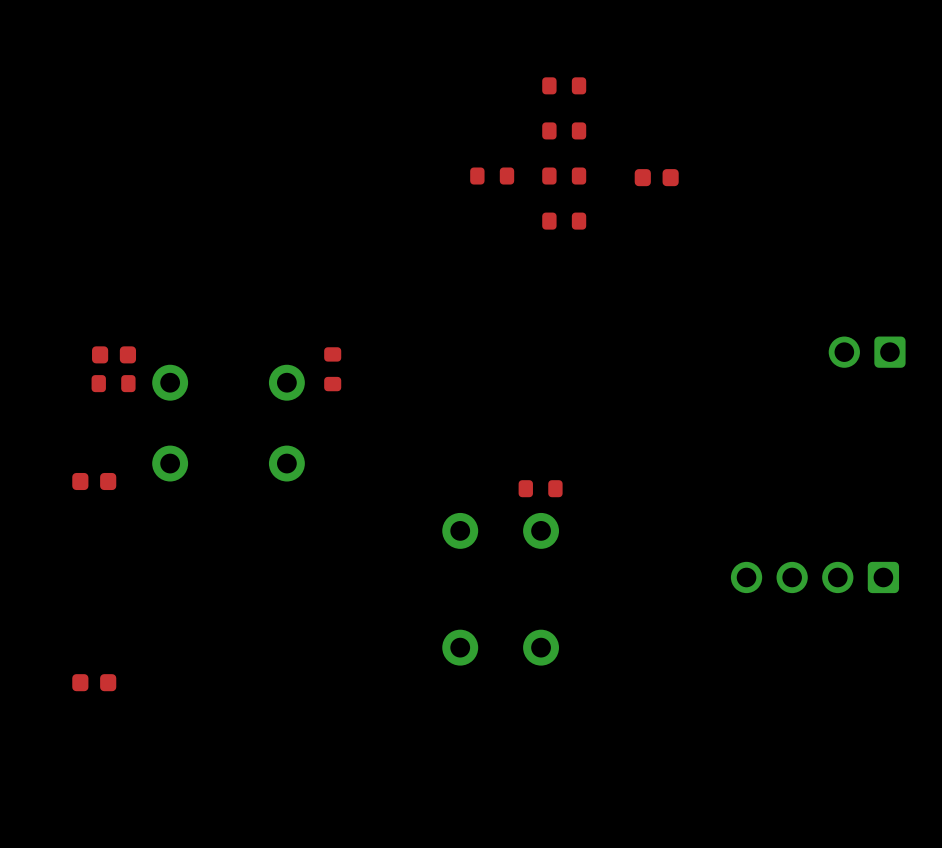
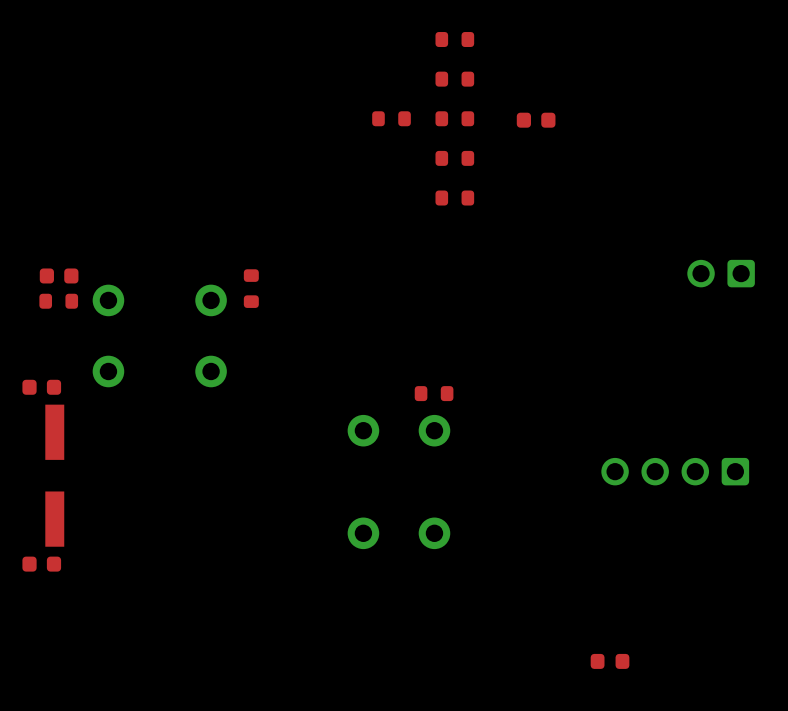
part: none -> (454, 198)
part: none -> (54, 475)
part: none -> (610, 661)

